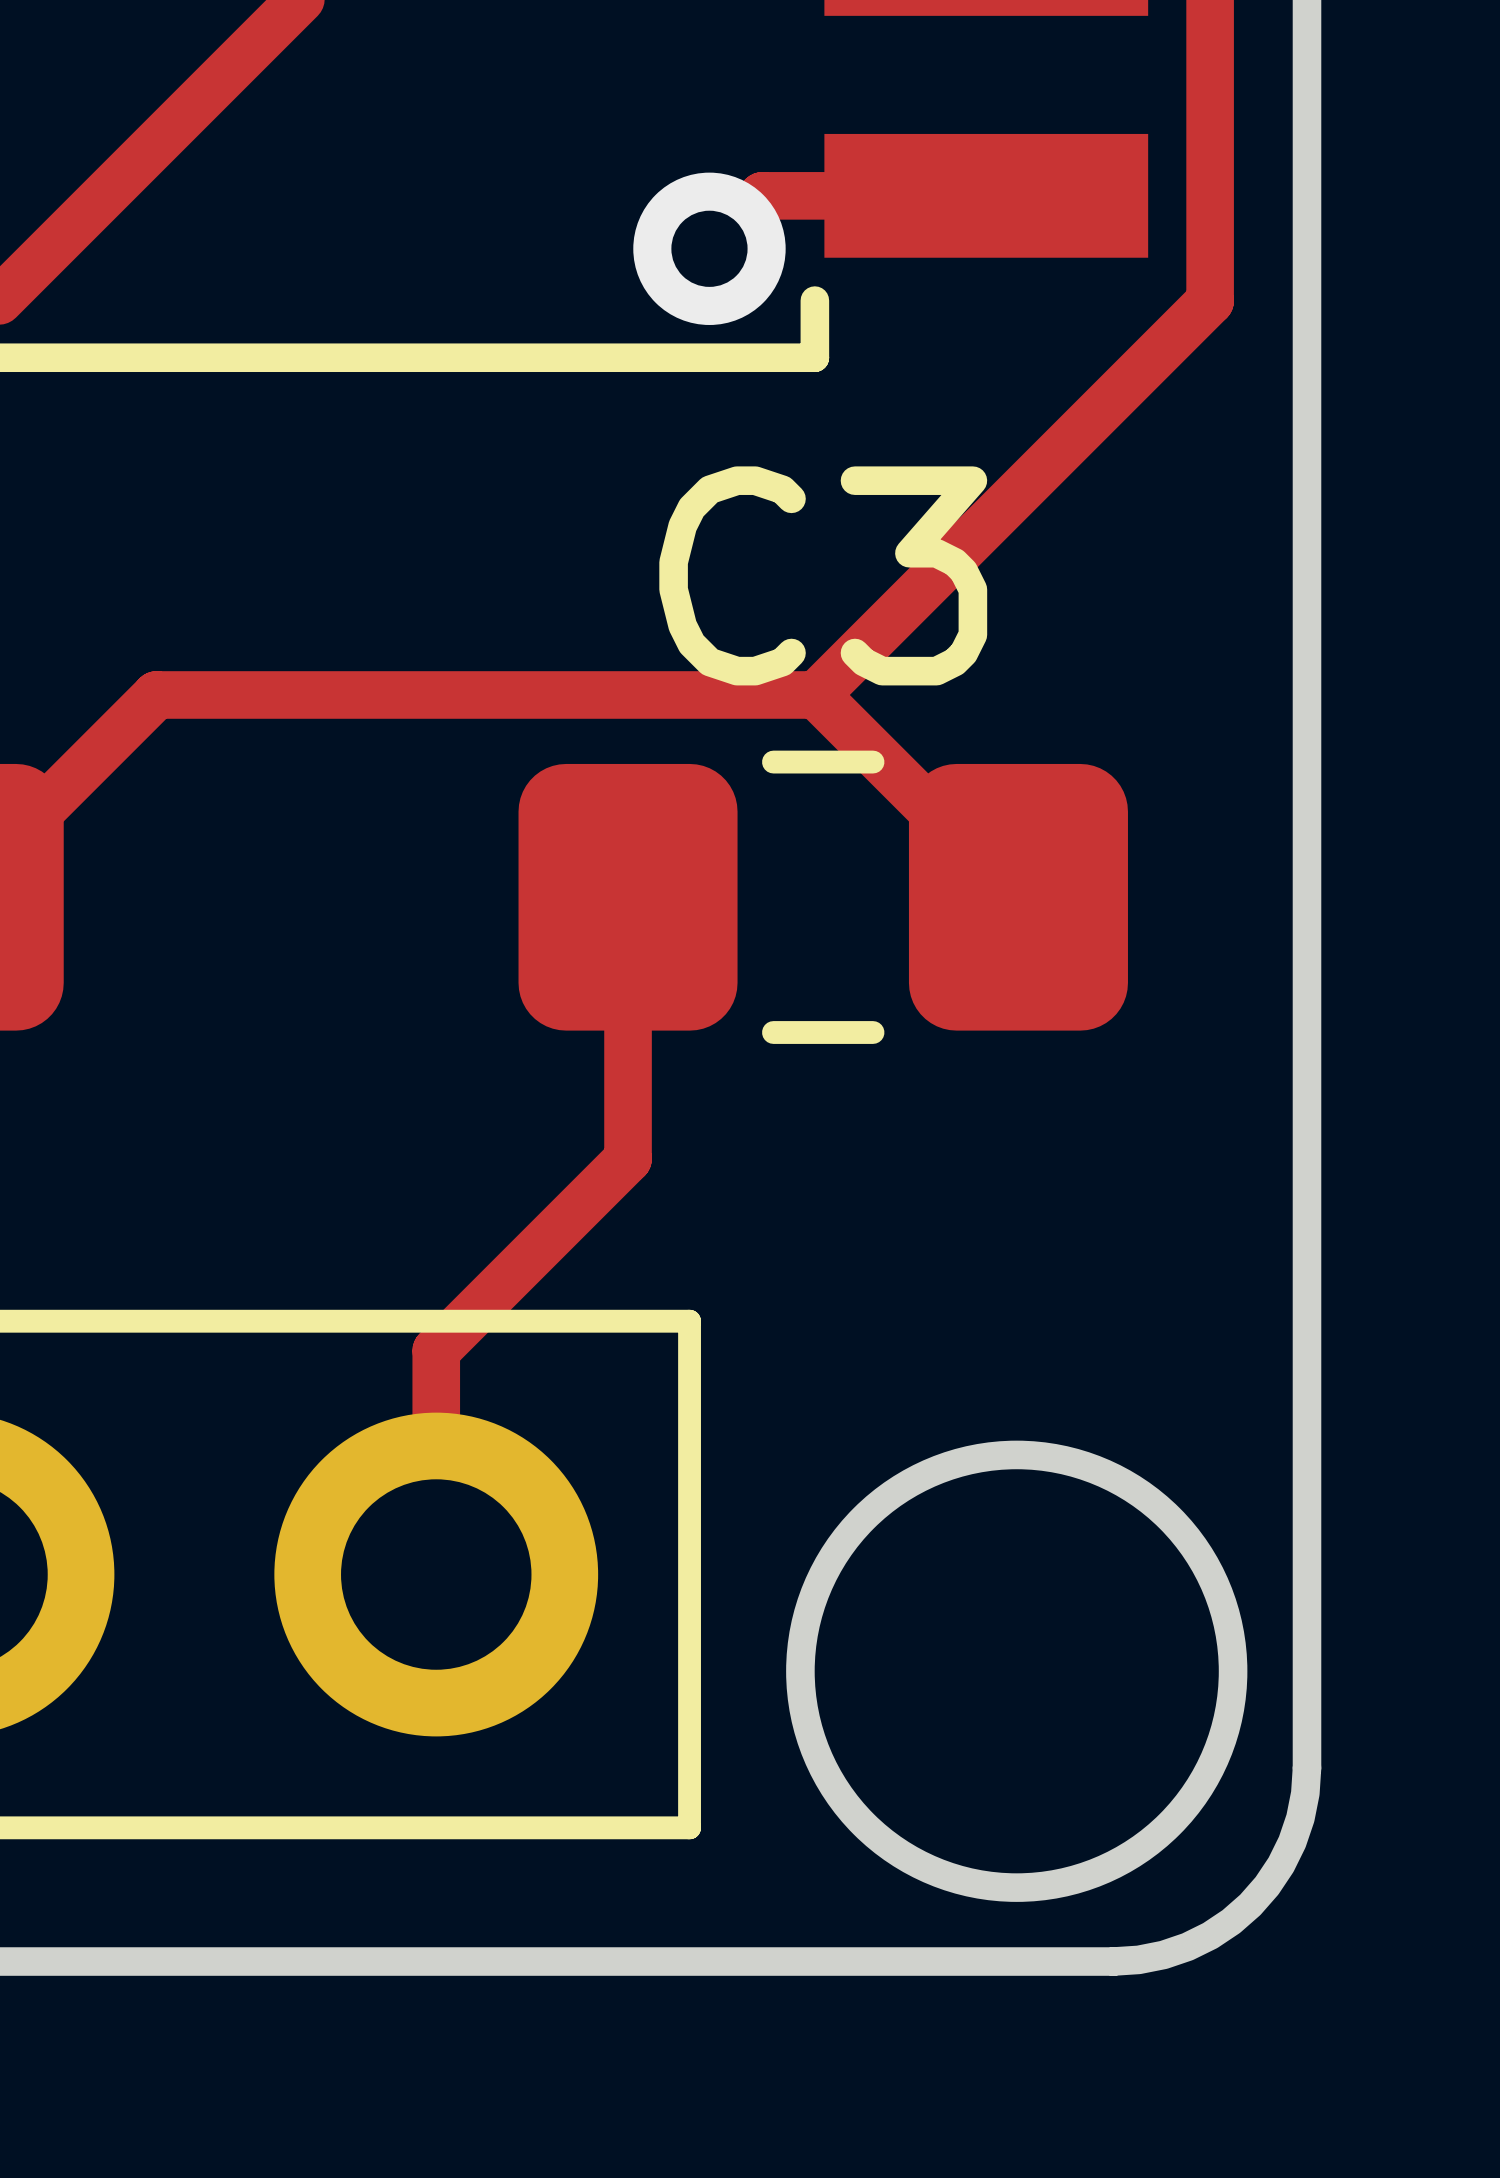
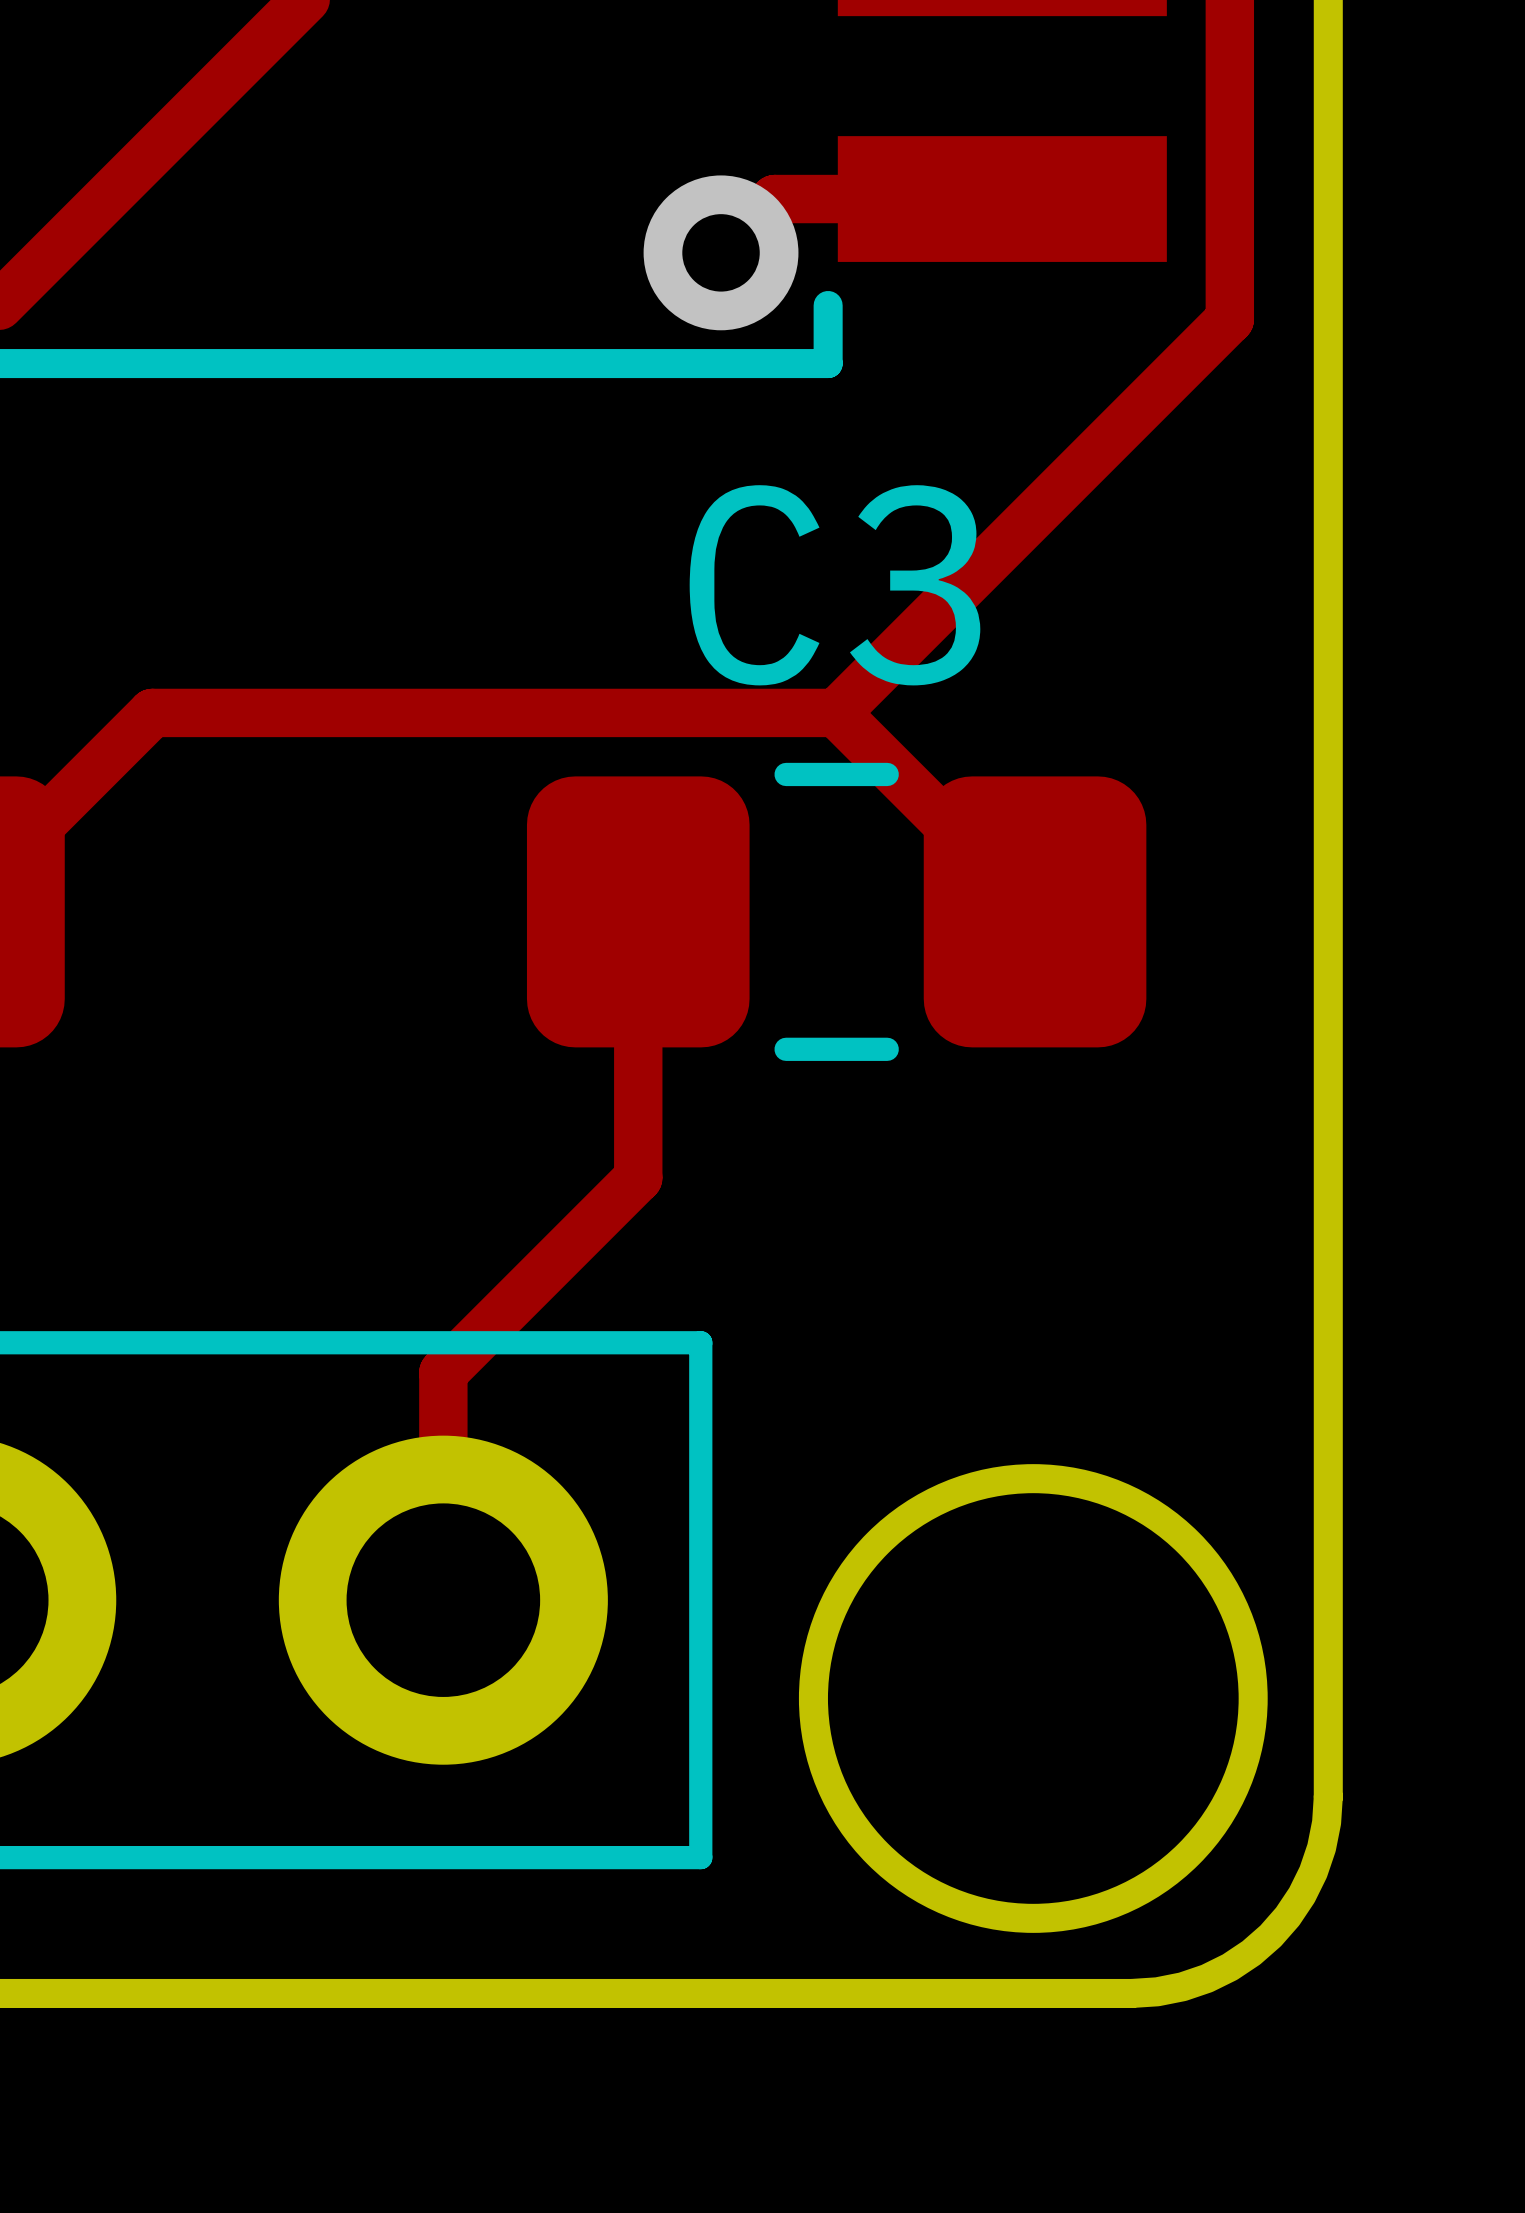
track: (1210, 301) (816, 694) -> none
track: (816, 694) (156, 694) (149, 701) -> (1229, 305) (1229, 319) (836, 712) (152, 712)

